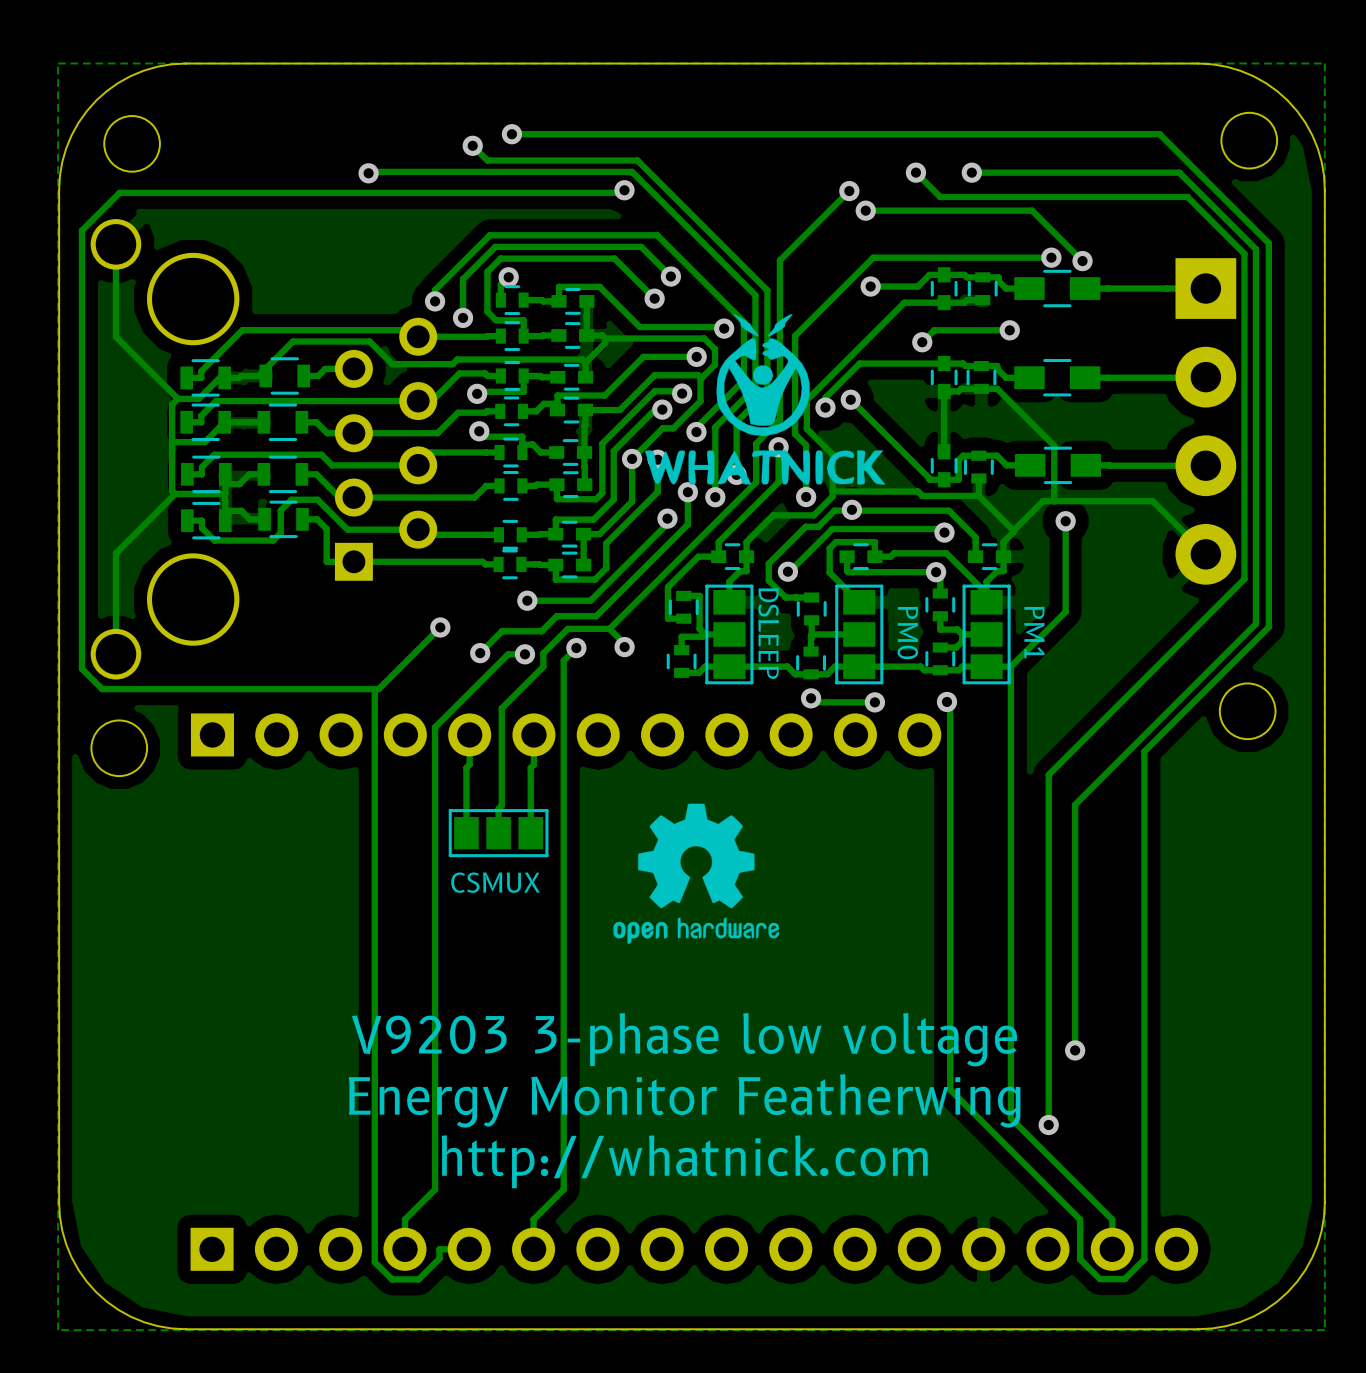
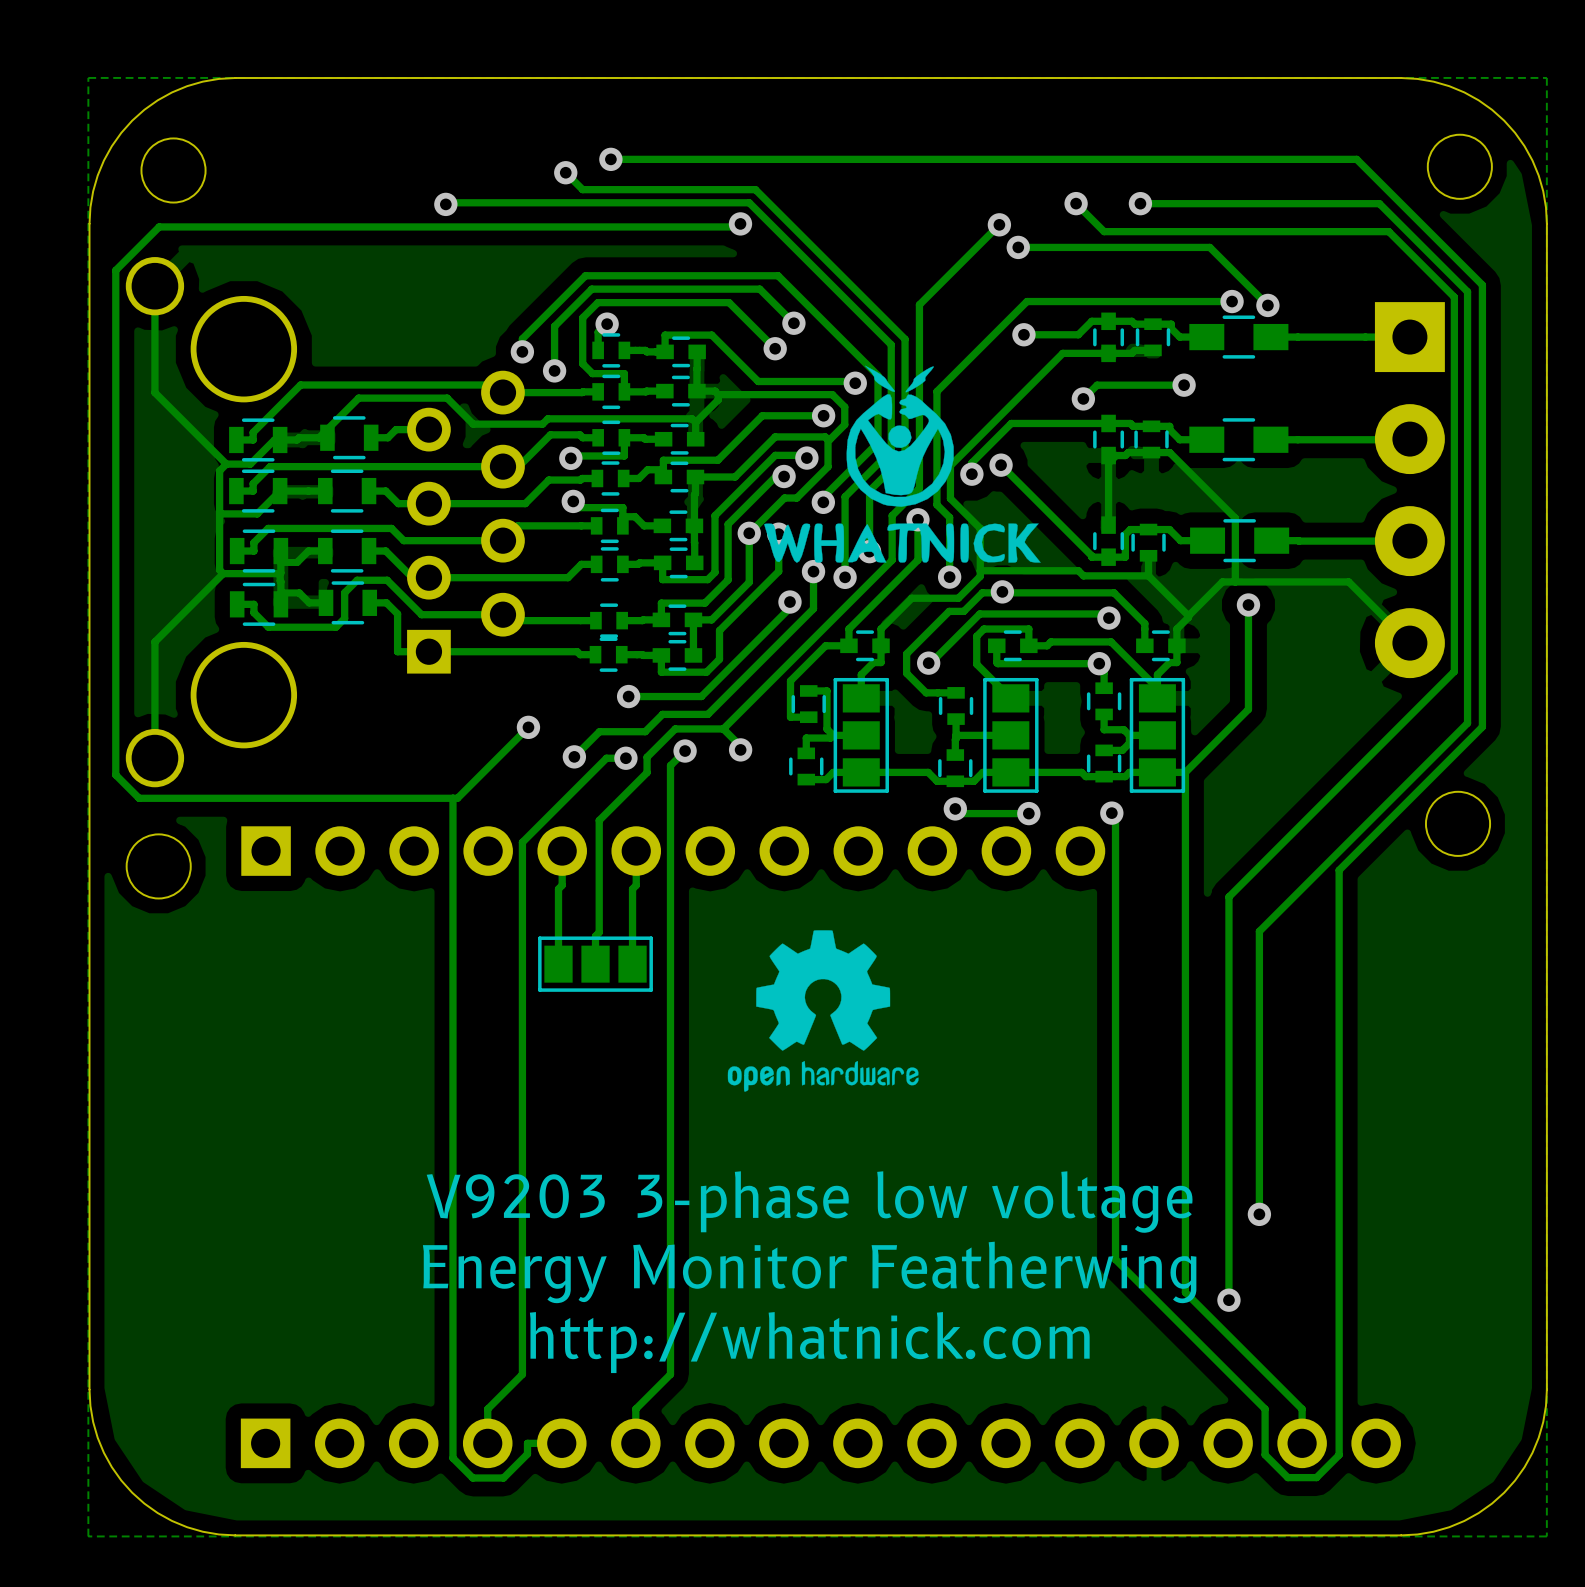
text: PM0 (907, 632) -> none
text: PM1 (1034, 632) -> none
text: DSLEEP (768, 633) -> none
text: CSMUX (495, 882) -> none

